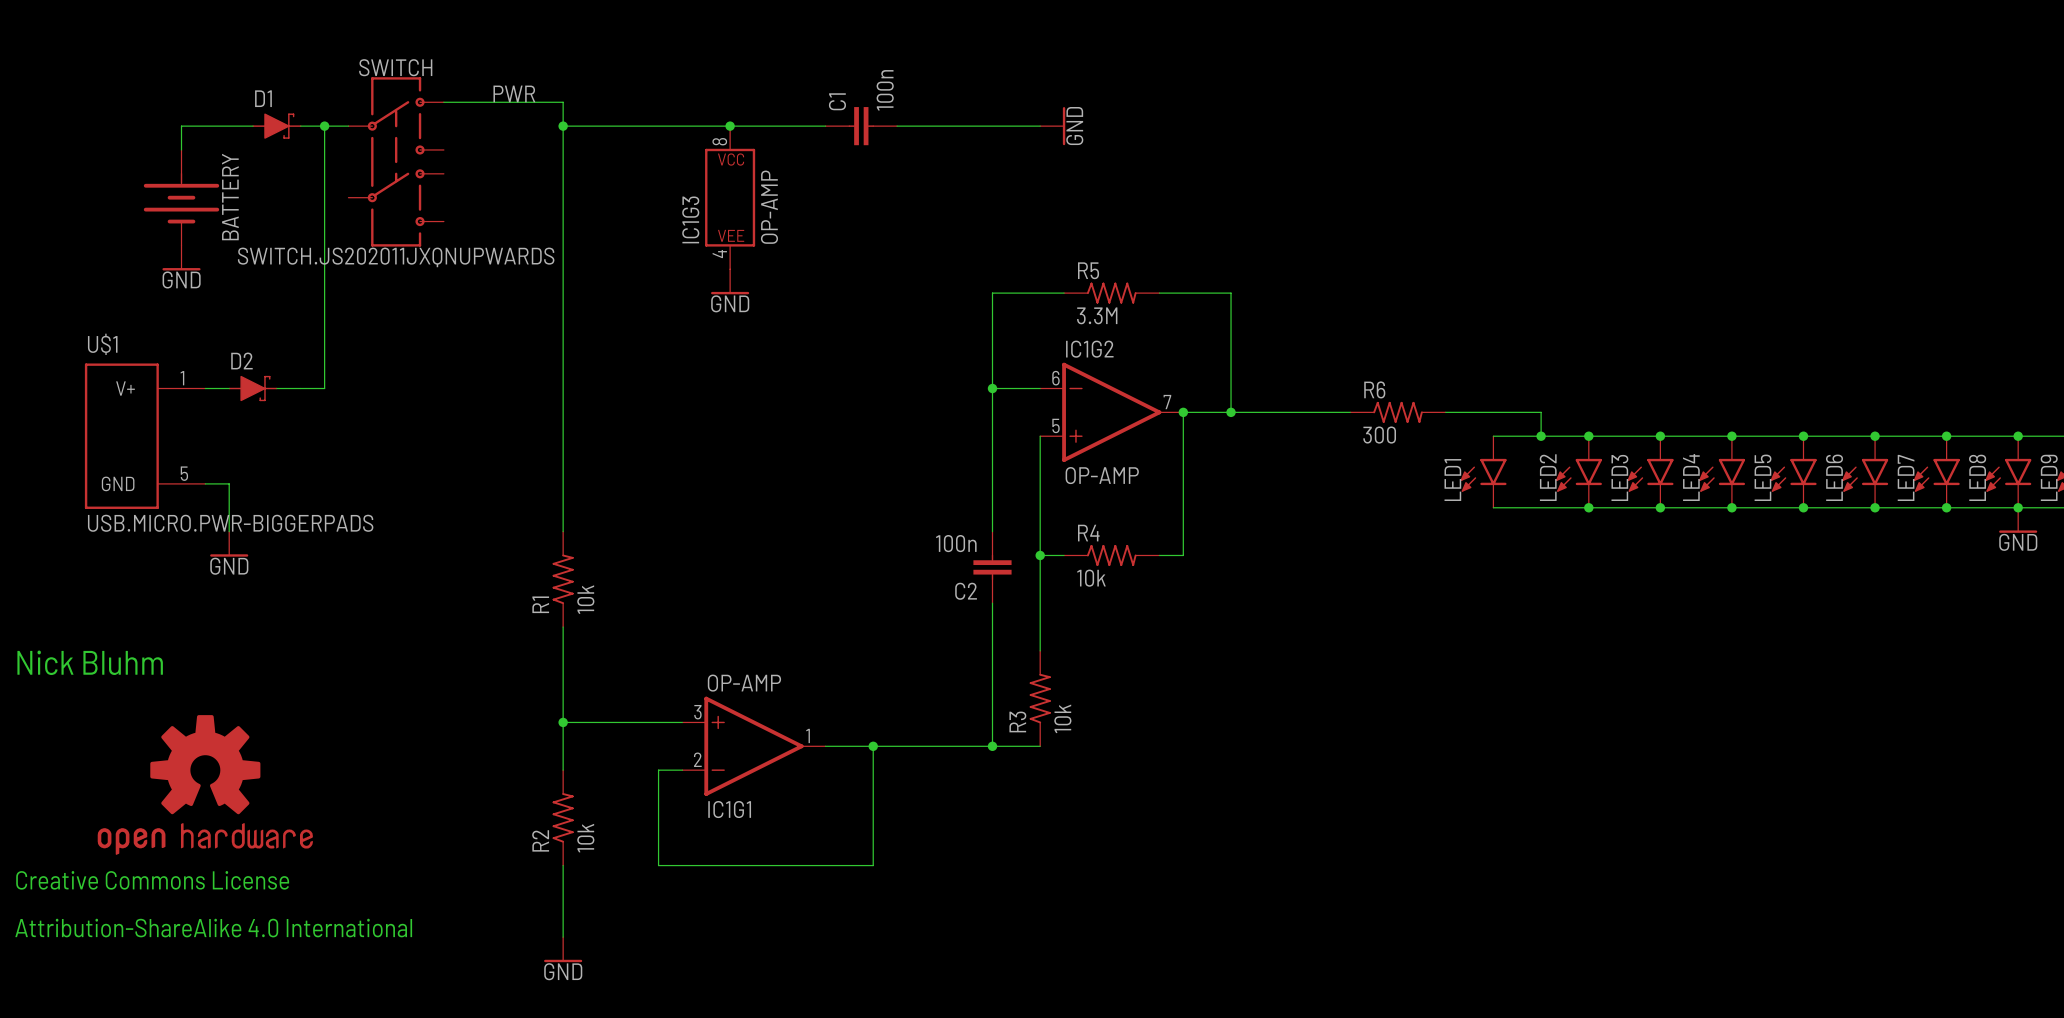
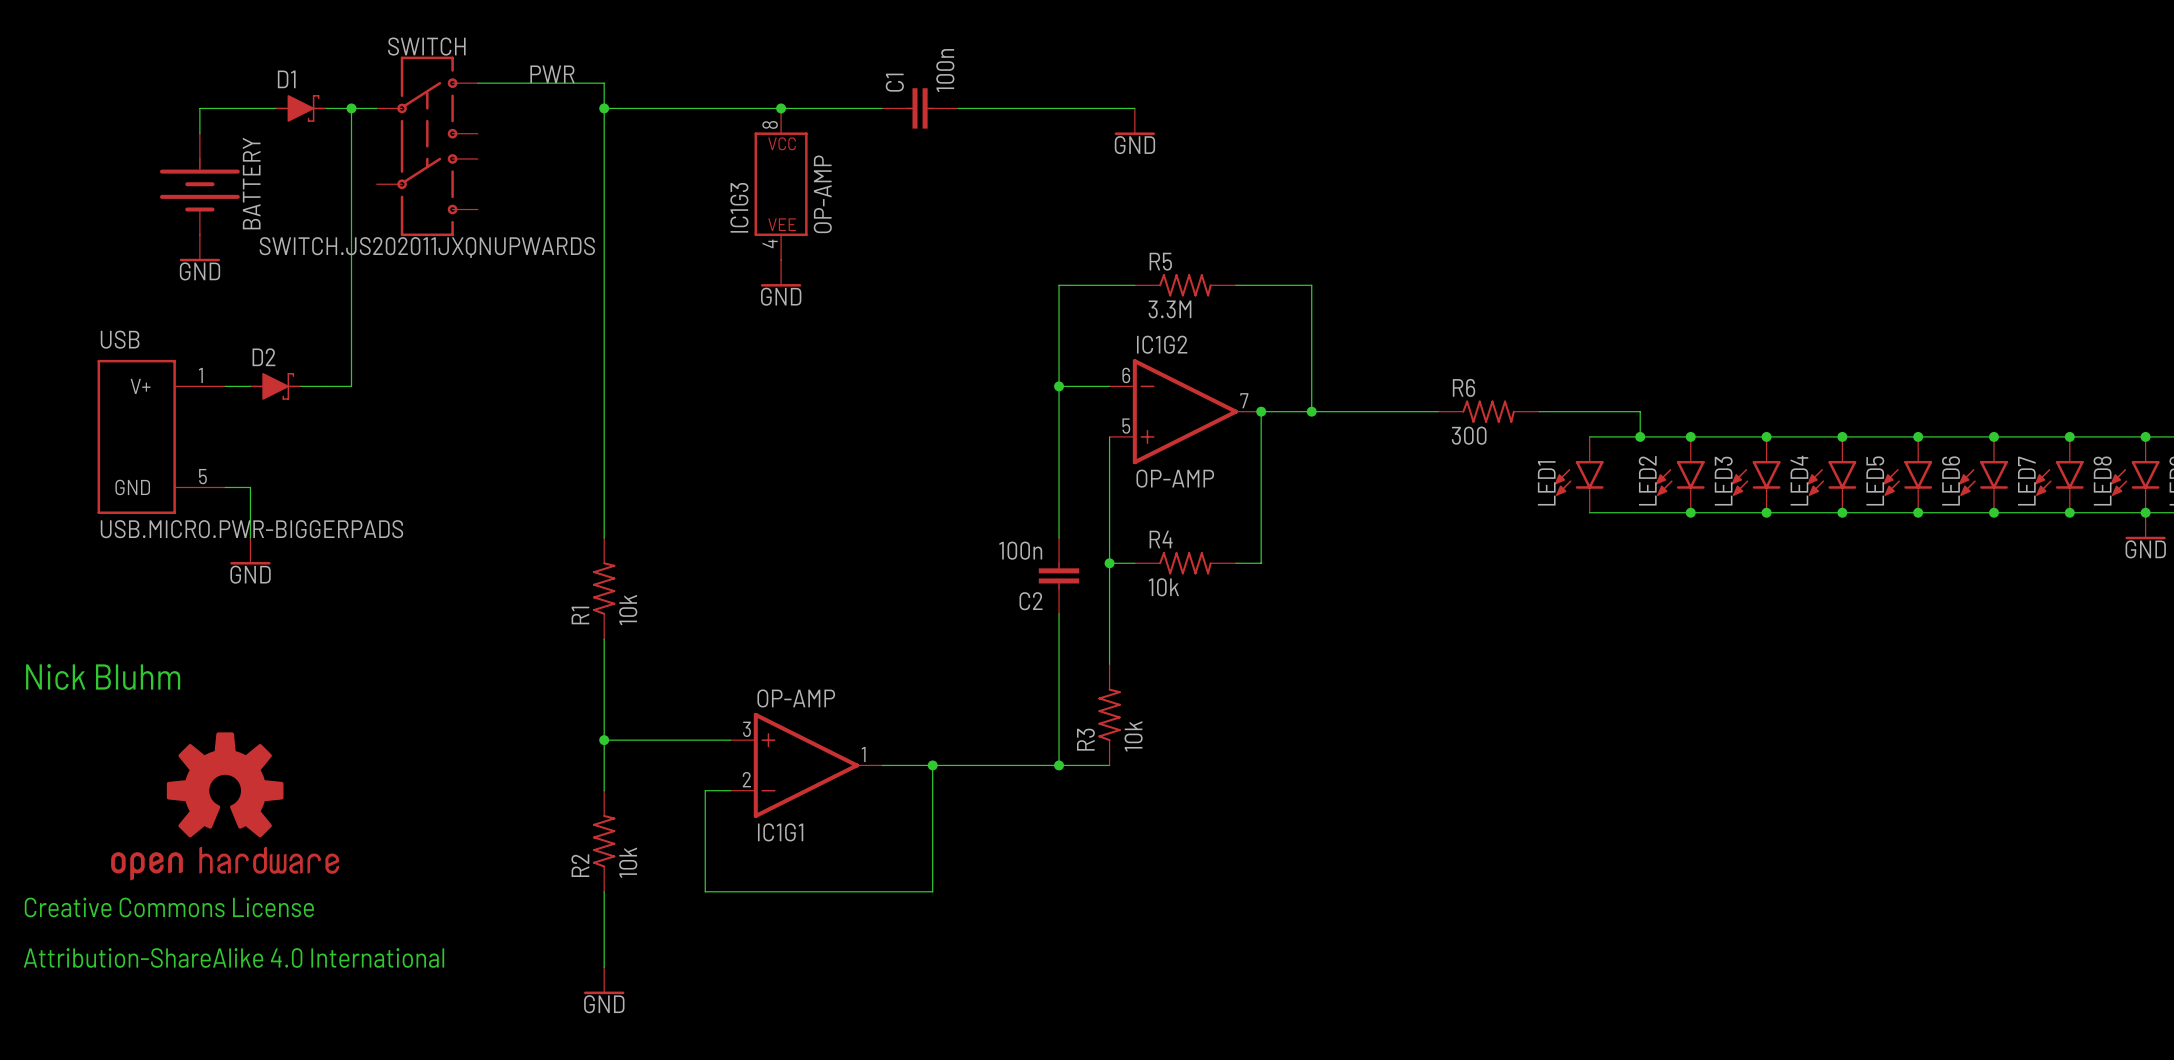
power symbol rotation: 0° (1064, 126) -> 90° clockwise (1134, 133)
U$1 name: U$1 (102, 344) -> USB (120, 339)

